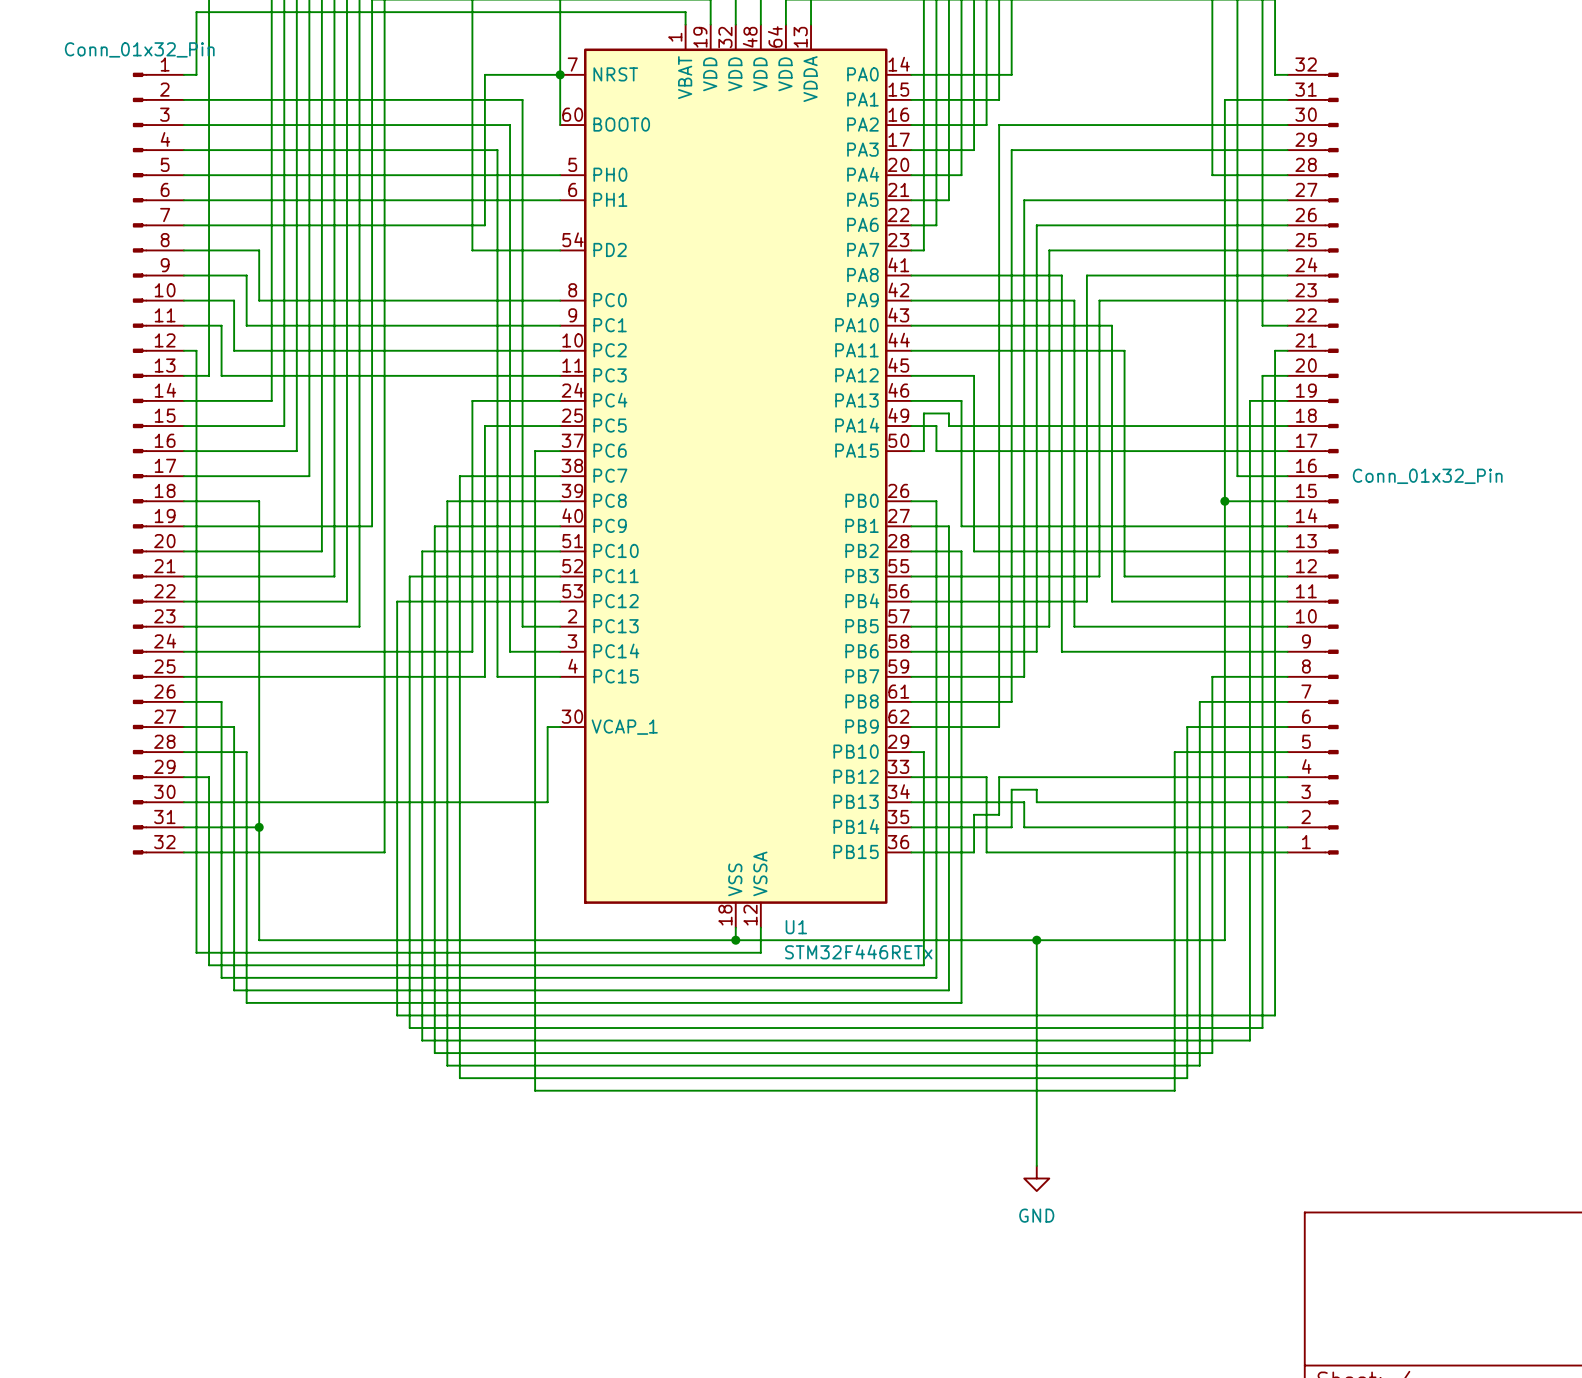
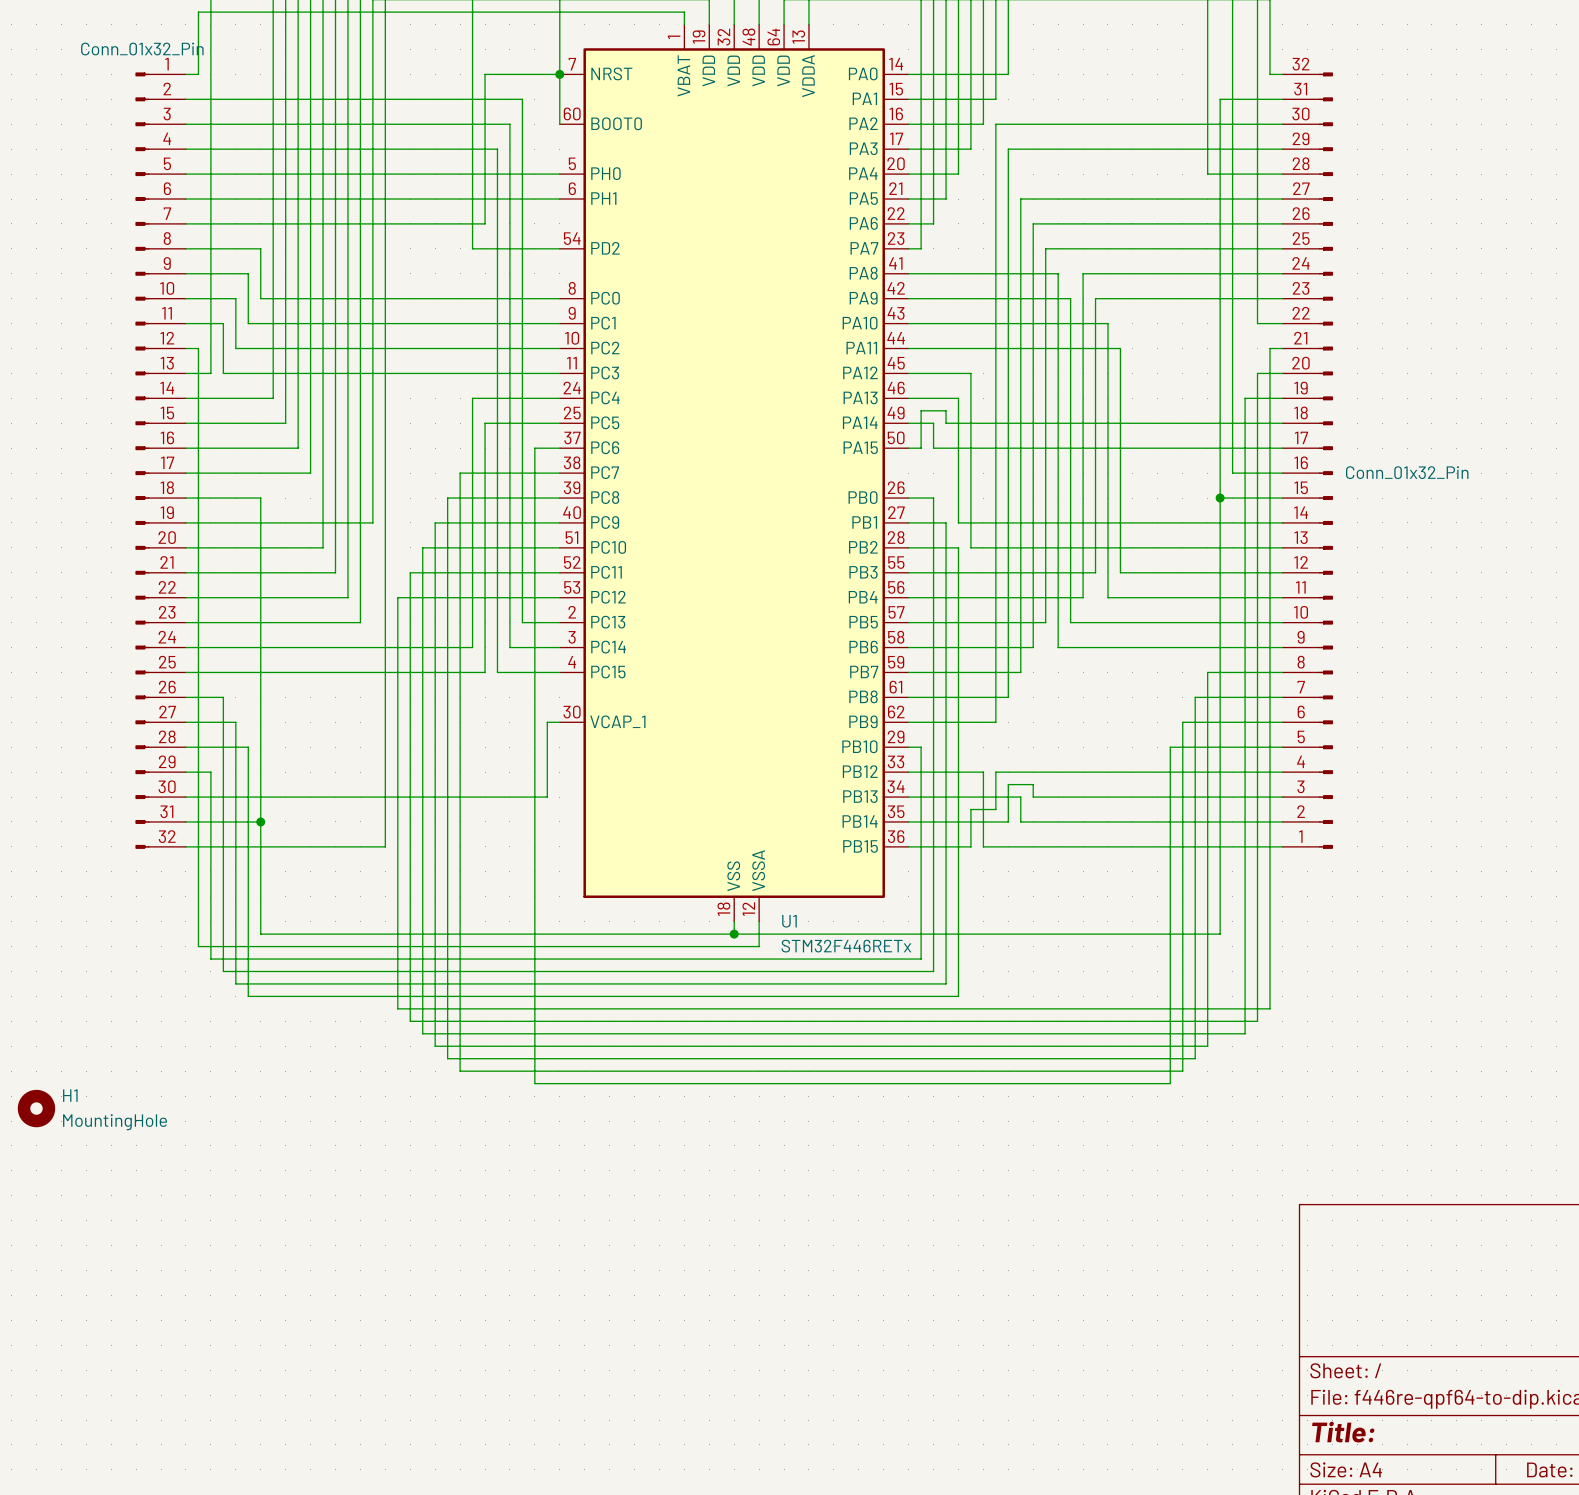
wire: (1036, 940) (1036, 1165) -> none
junction: (1036, 940) -> none
H1: none -> MountingHole (36, 1108)
power symbol: GND (1036, 1178) -> none

